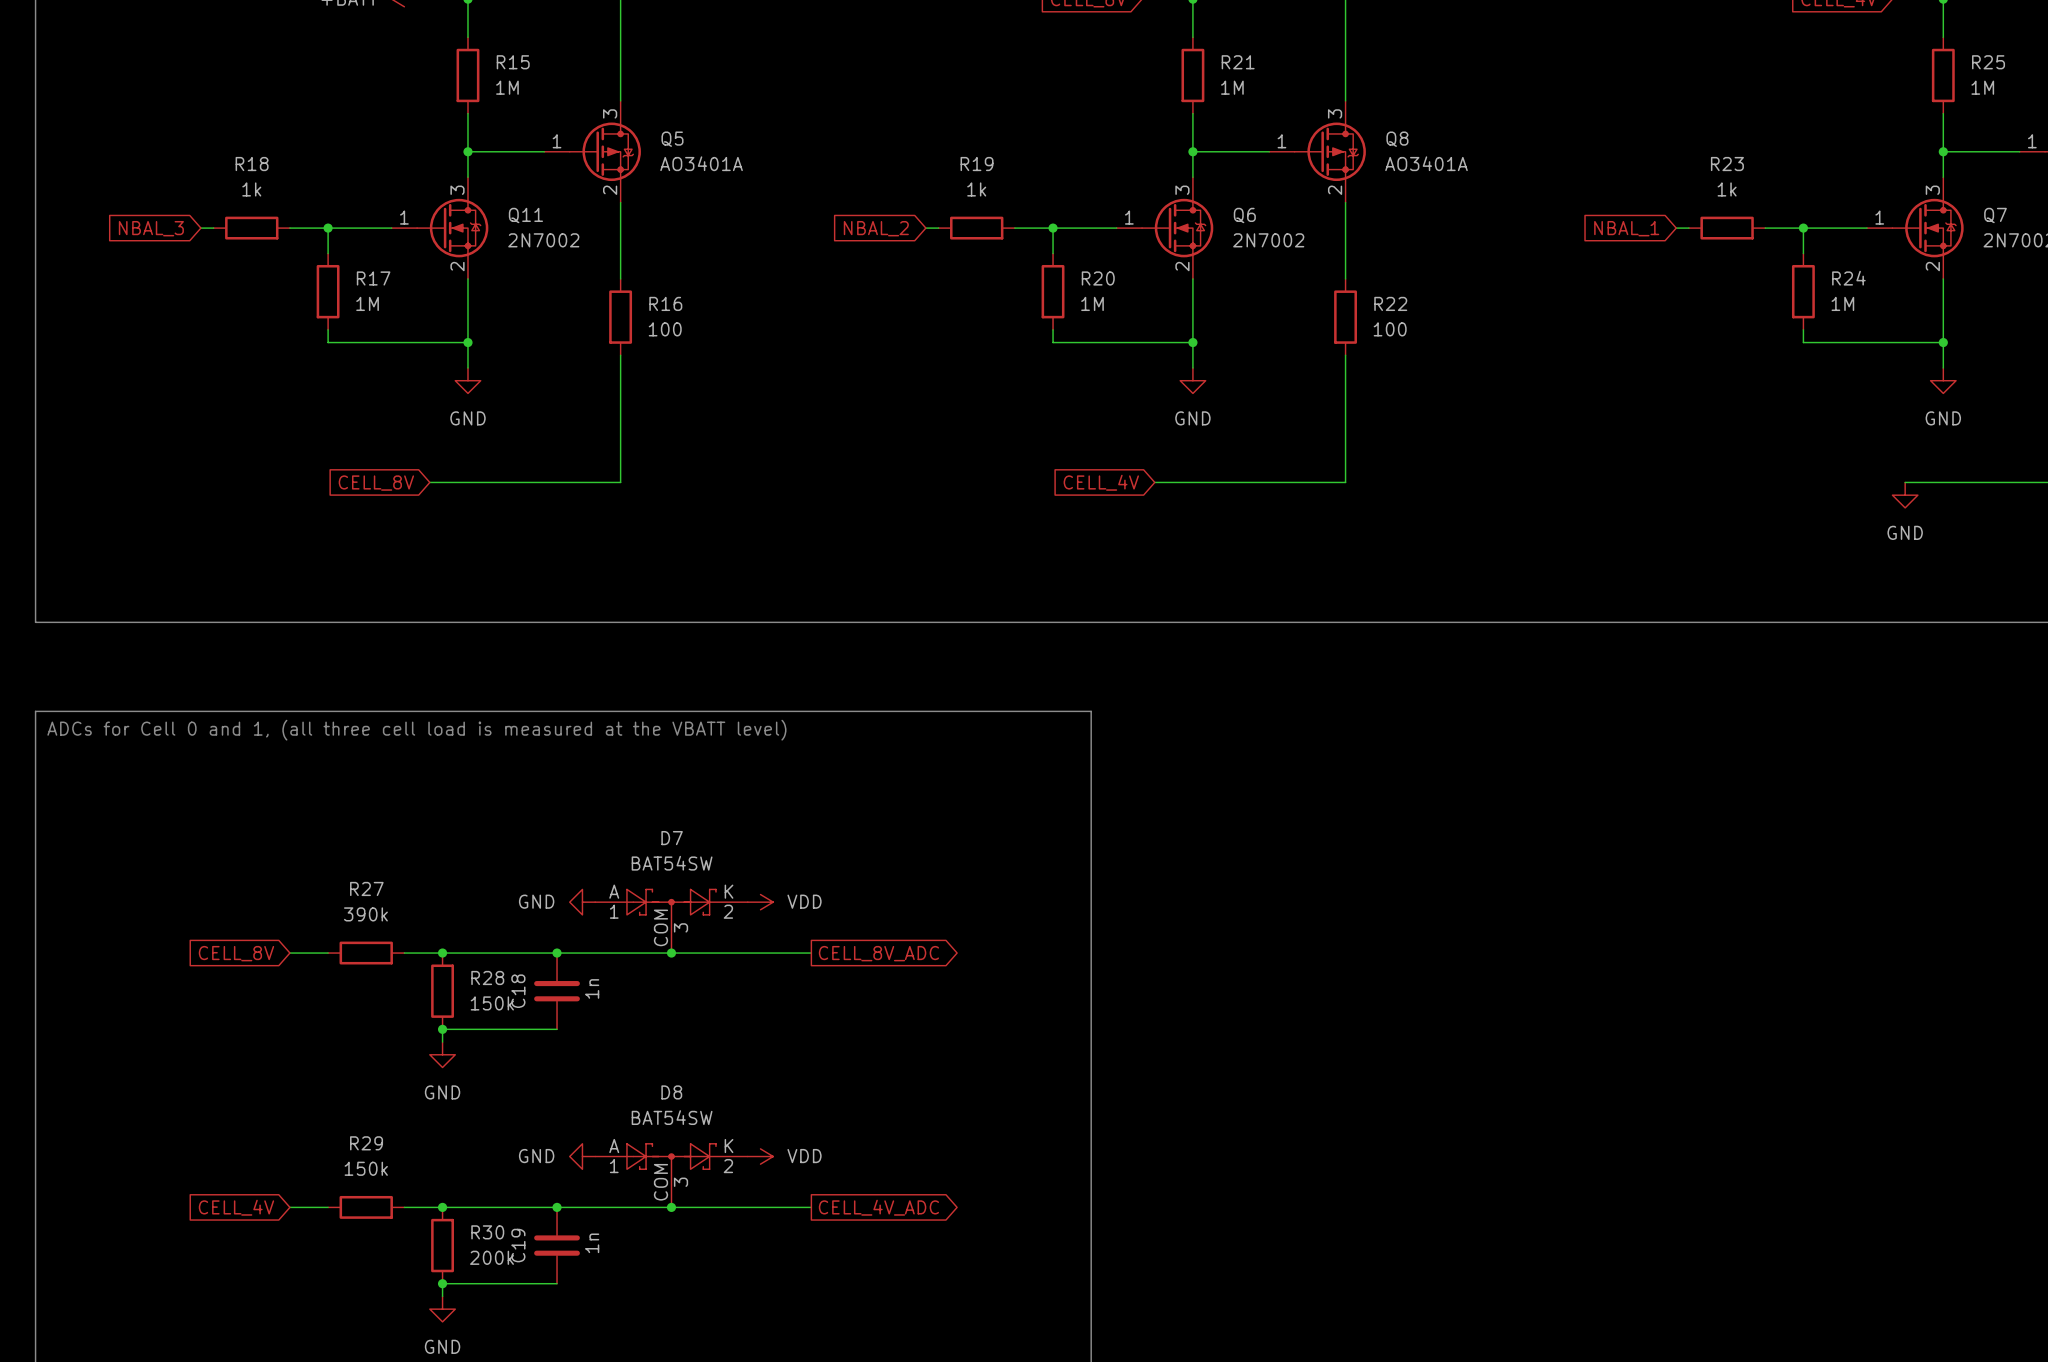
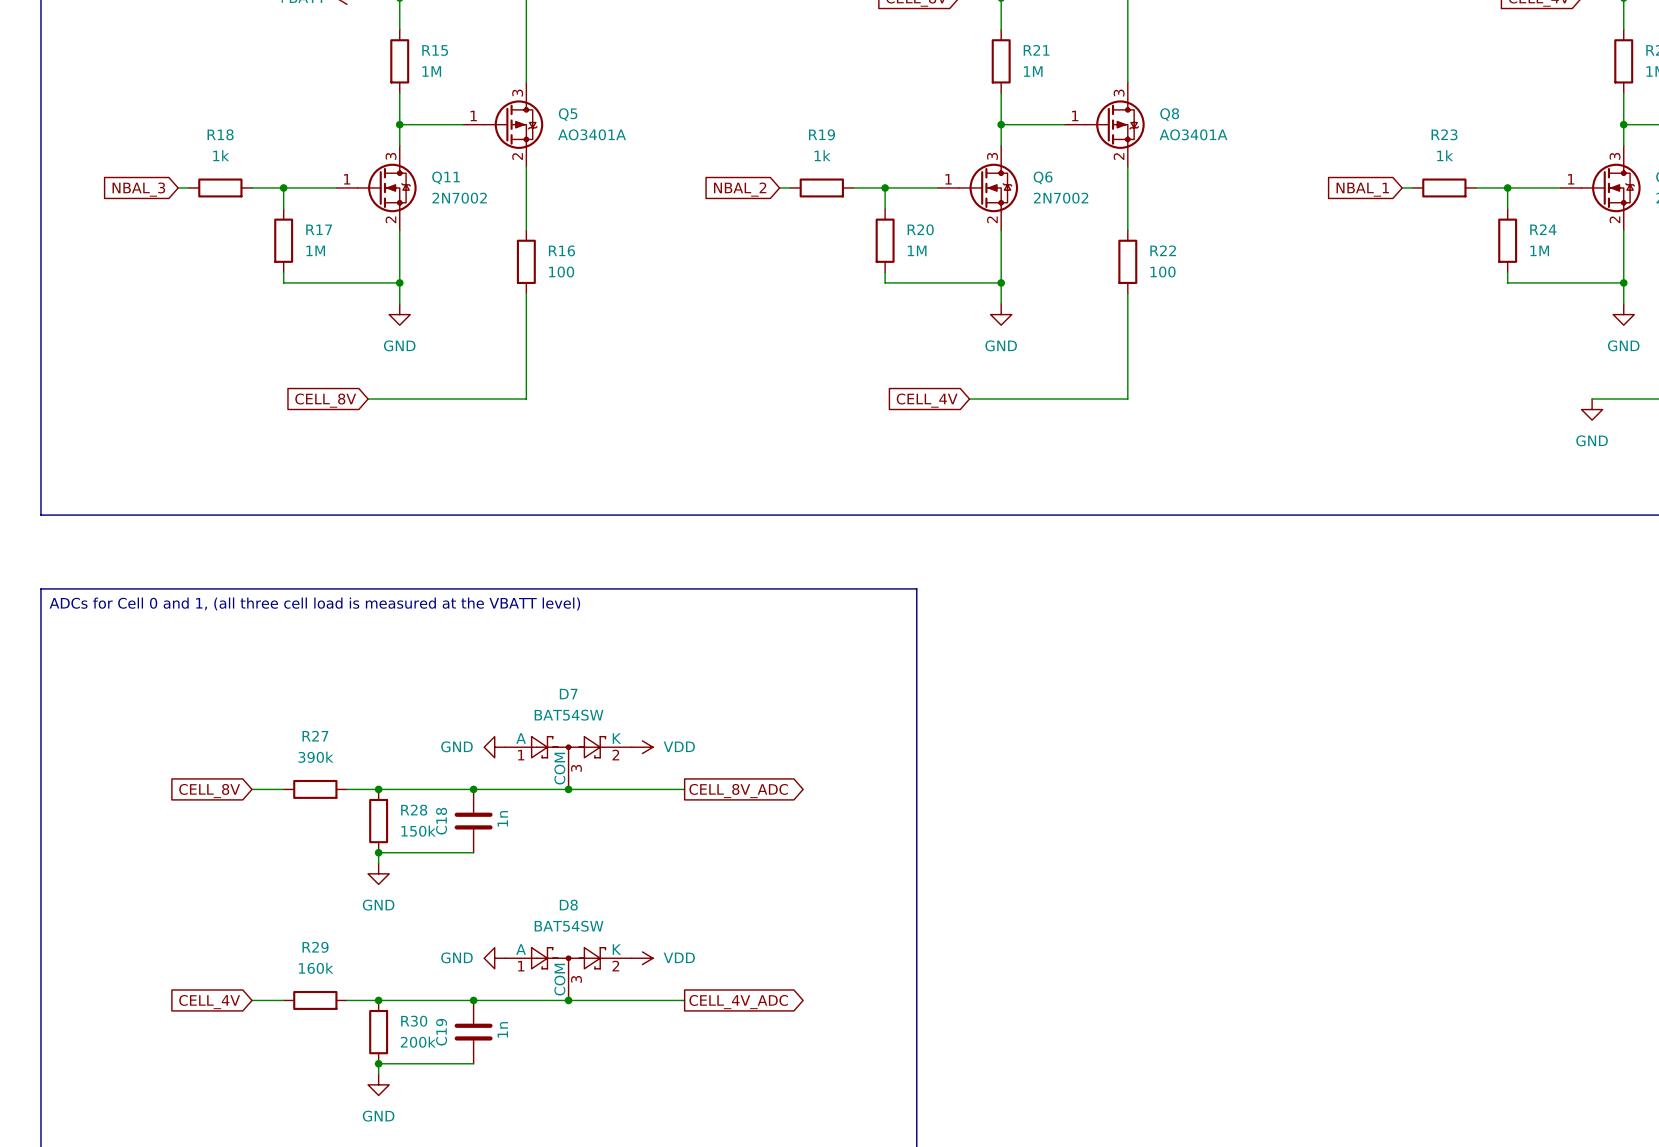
R29 value: 150k (366, 1168) -> 160k (316, 968)

